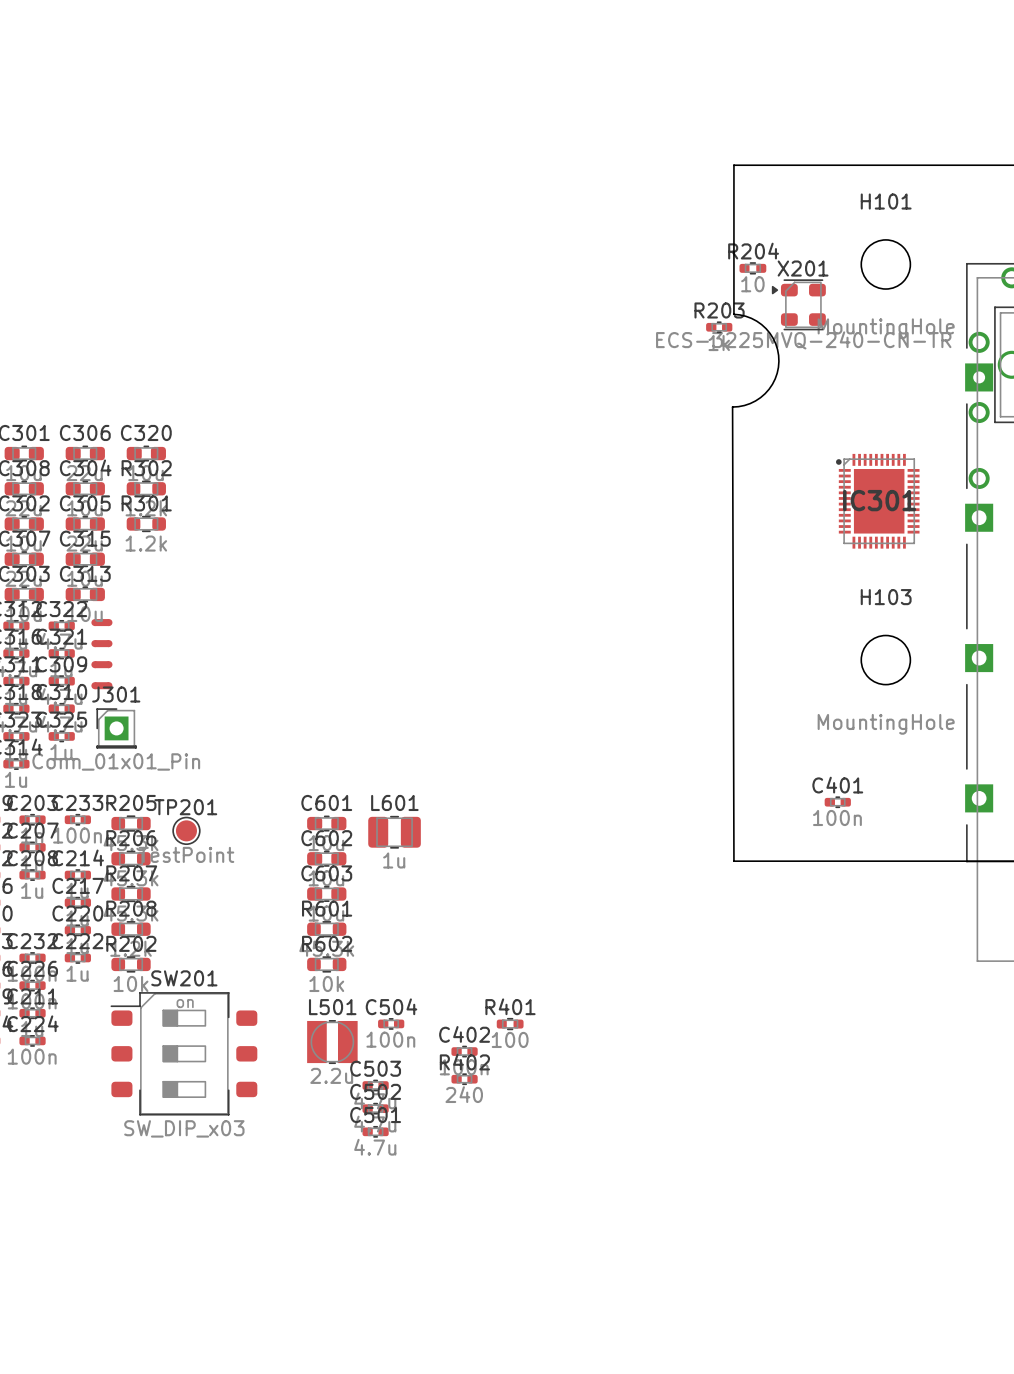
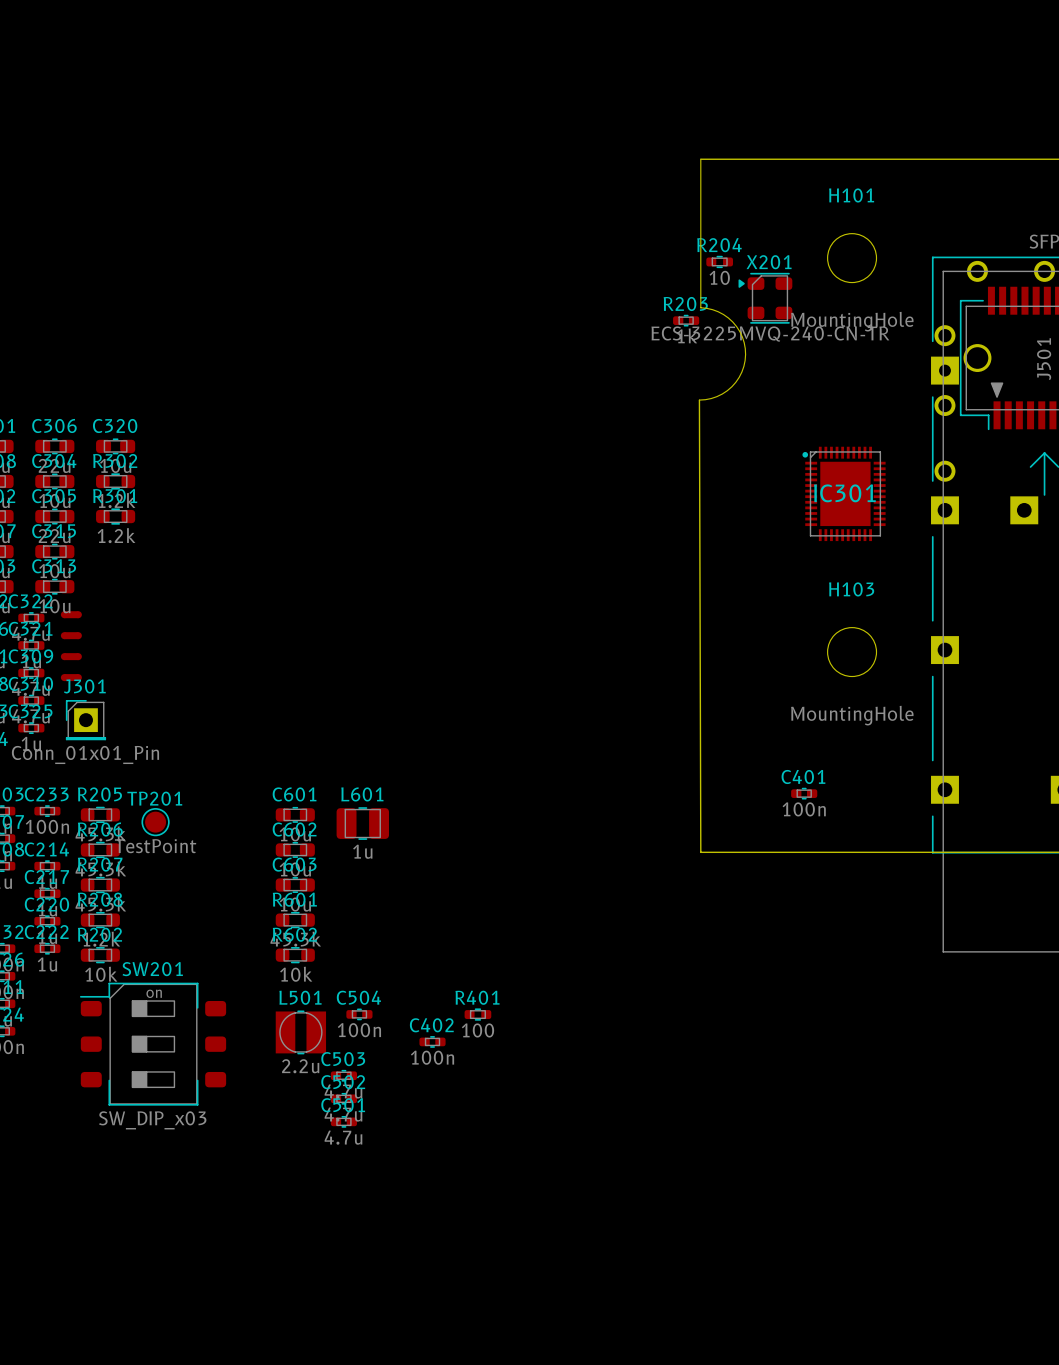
R402: 240 (464, 1079) -> none

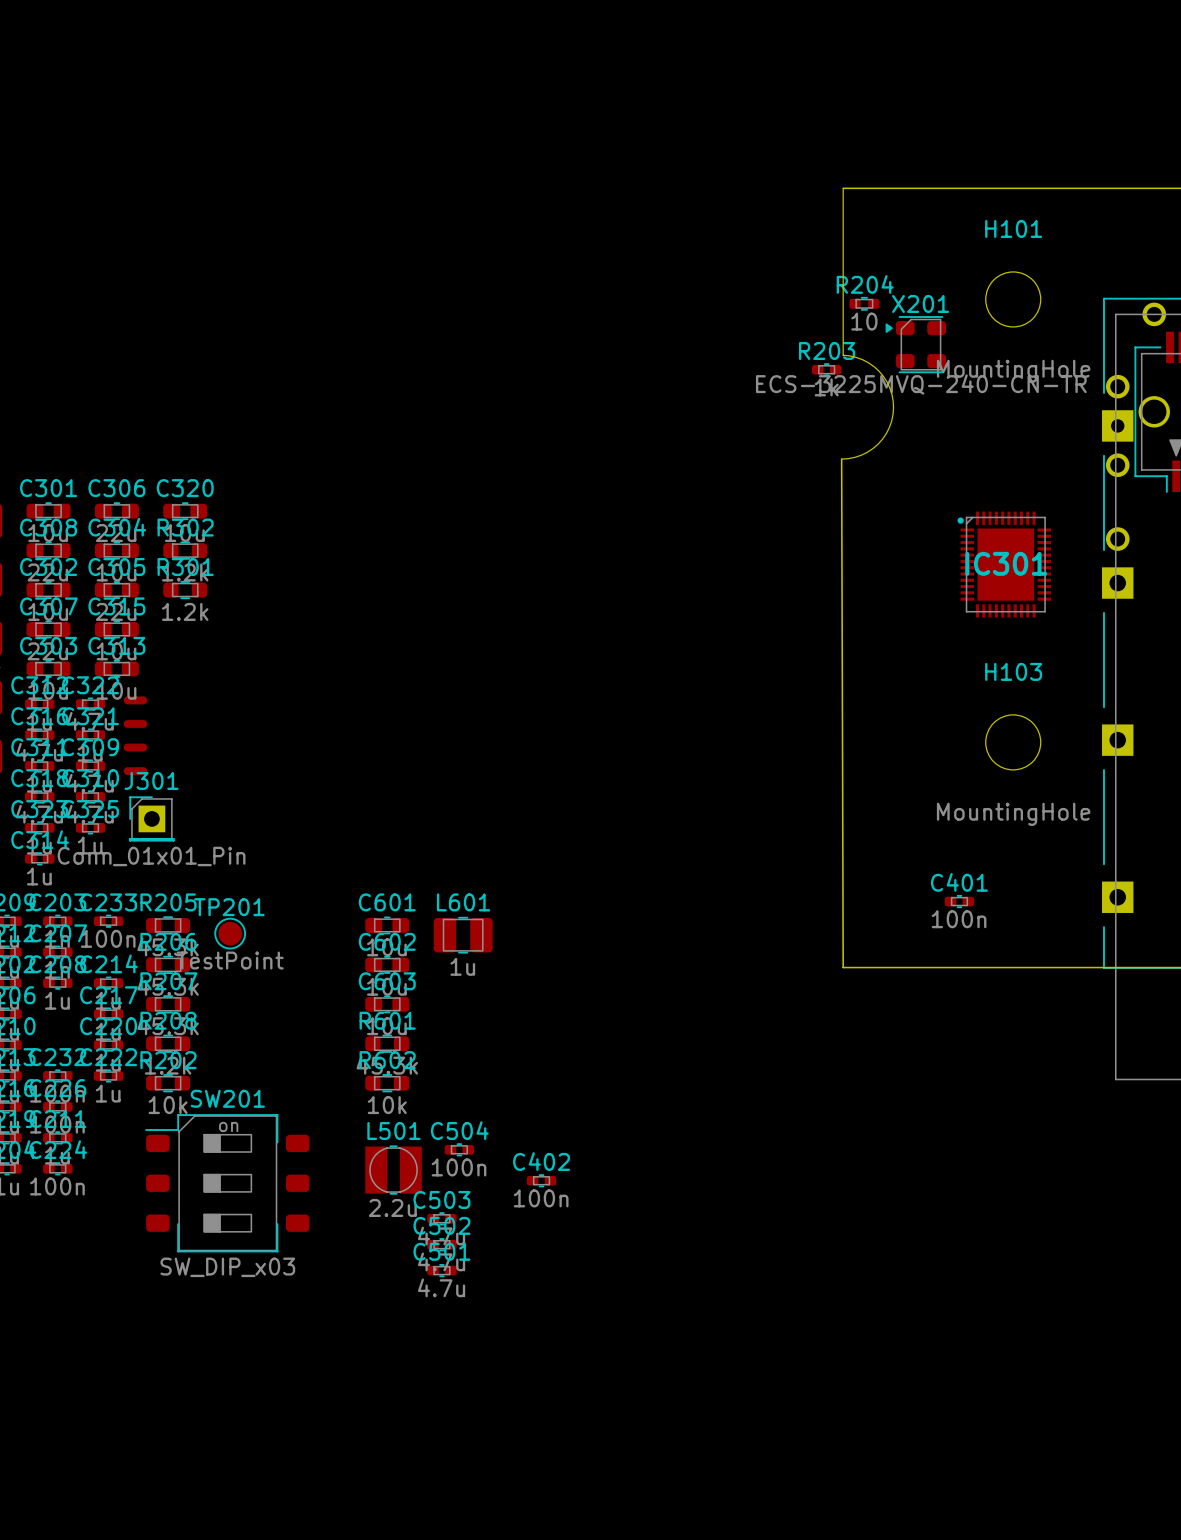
R401: 100 (477, 1014) -> none

